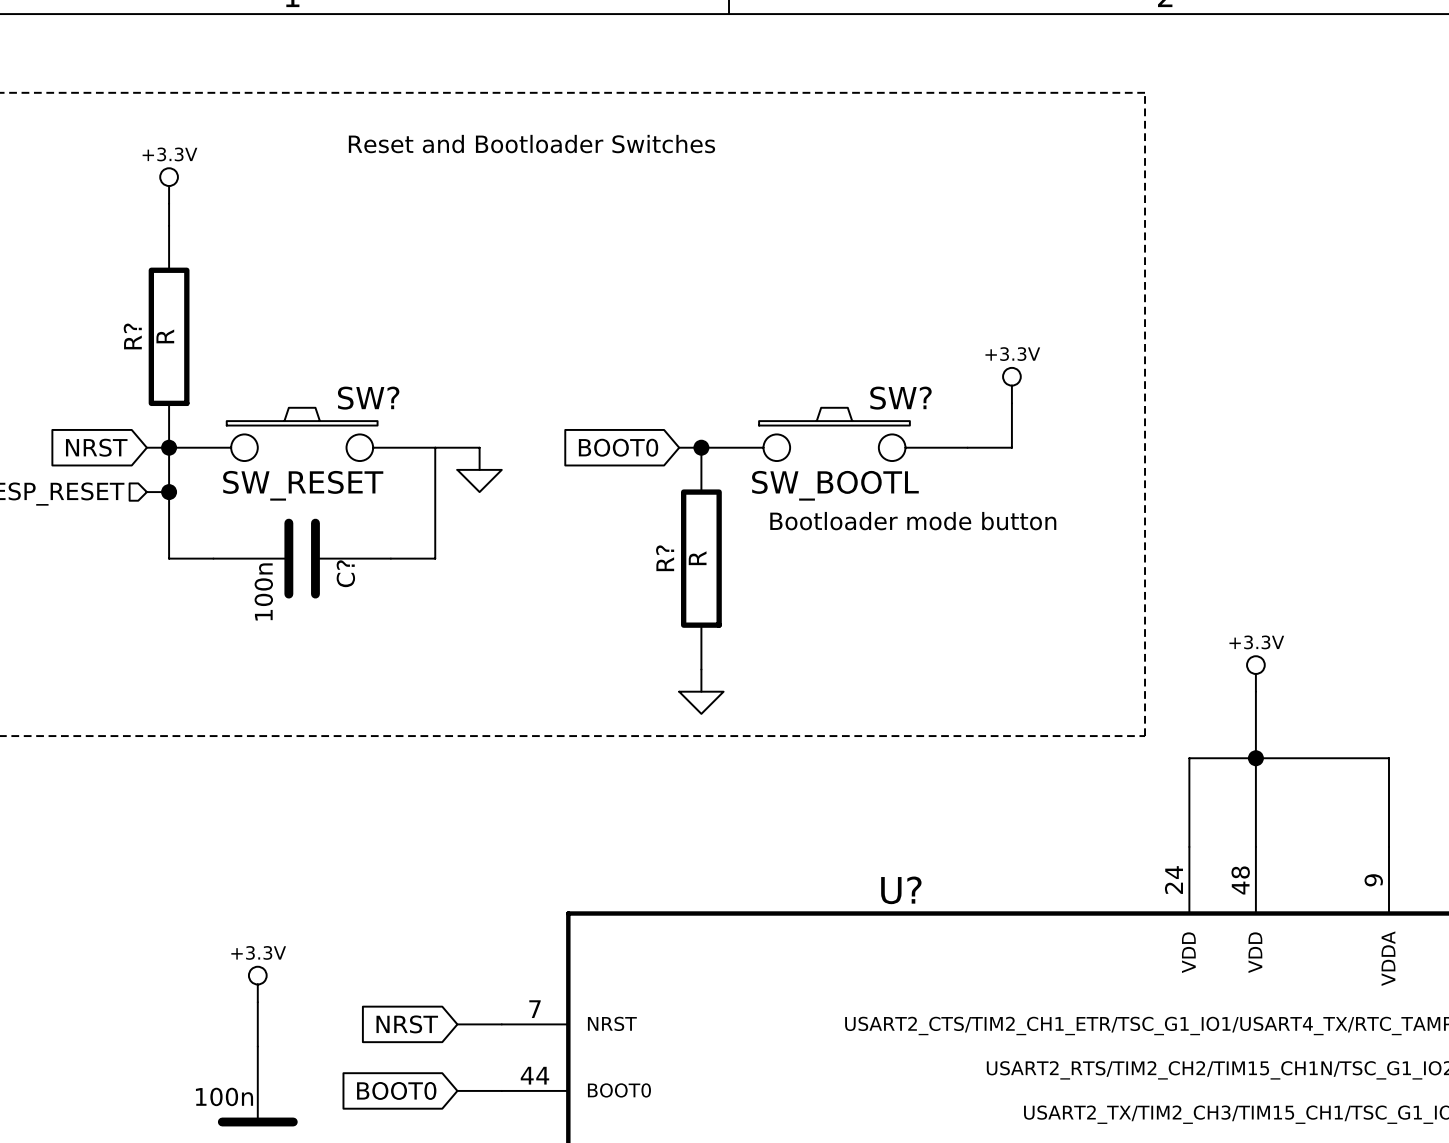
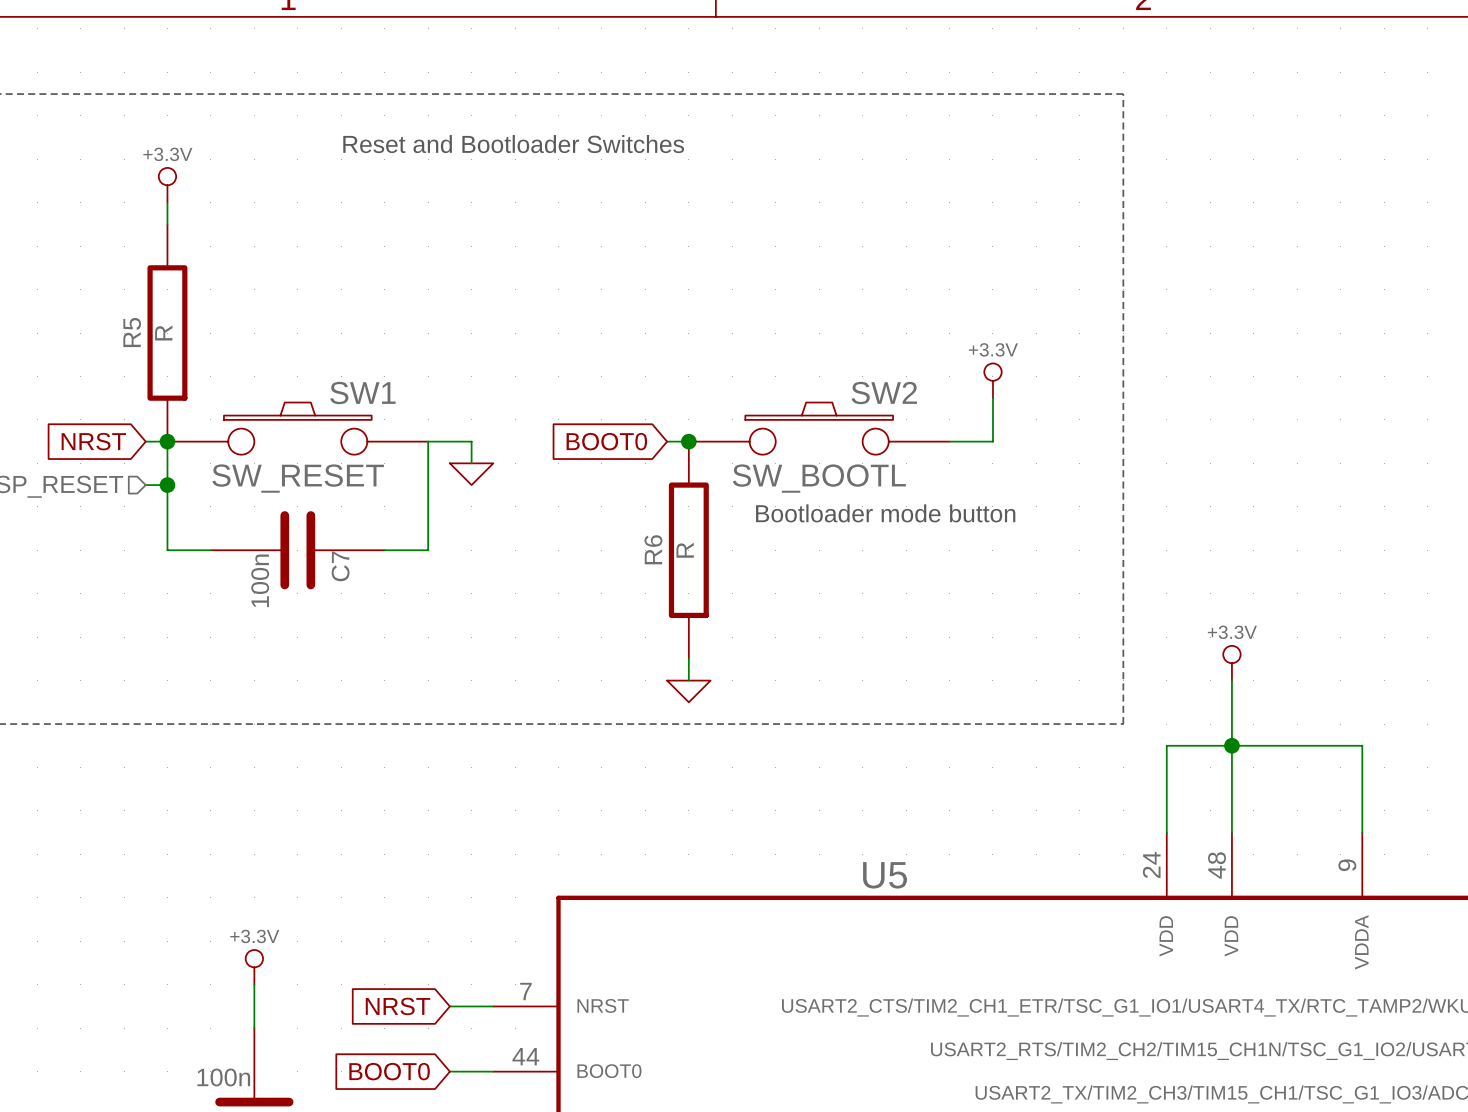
R? name: R? (132, 336) -> R5 (132, 332)
SW? name: SW? (368, 398) -> SW1 (362, 393)
SW? name: SW? (900, 398) -> SW2 (884, 393)
R? name: R? (665, 558) -> R6 (653, 549)
C? name: C? (345, 573) -> C7 (340, 566)
U? name: U? (901, 890) -> U5 (885, 875)

